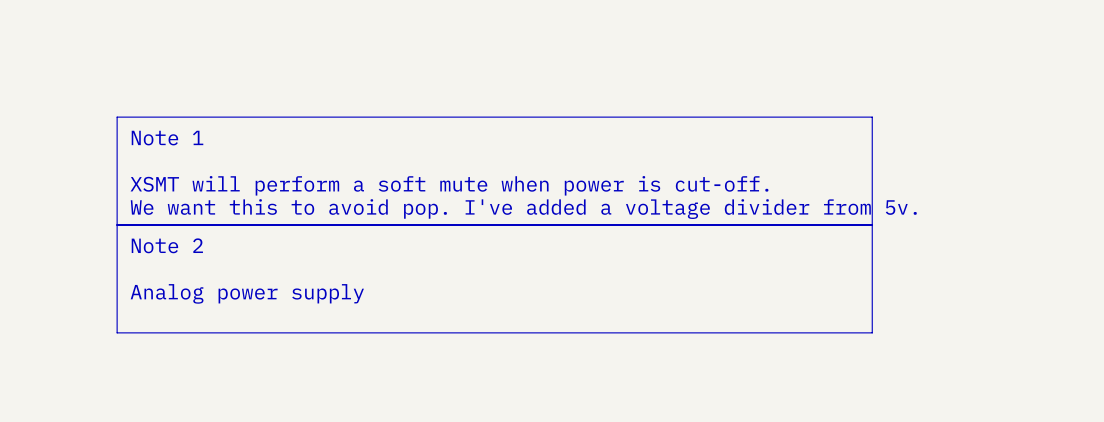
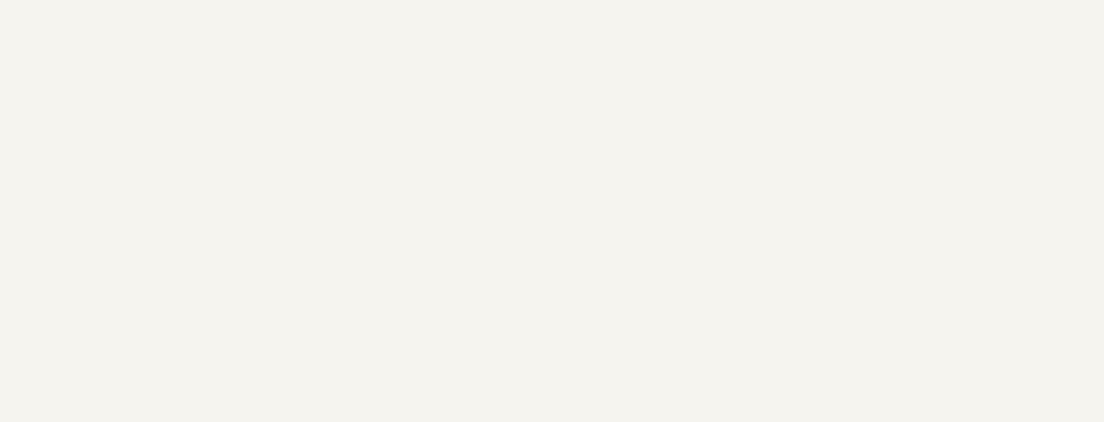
line: (117, 117) (872, 117) (872, 332) (117, 332) (117, 117) -> none
text: Note 1 (167, 138) -> none
text: XSMT will perform a soft mute when power is cut-off. (449, 185) -> none
text: We want this to avoid pop. I've added a voltage divider from 5v. (523, 209) -> none
line: (117, 225) (872, 225) -> none
text: Note 2 (167, 245) -> none
text: Analog power supply (247, 293) -> none

